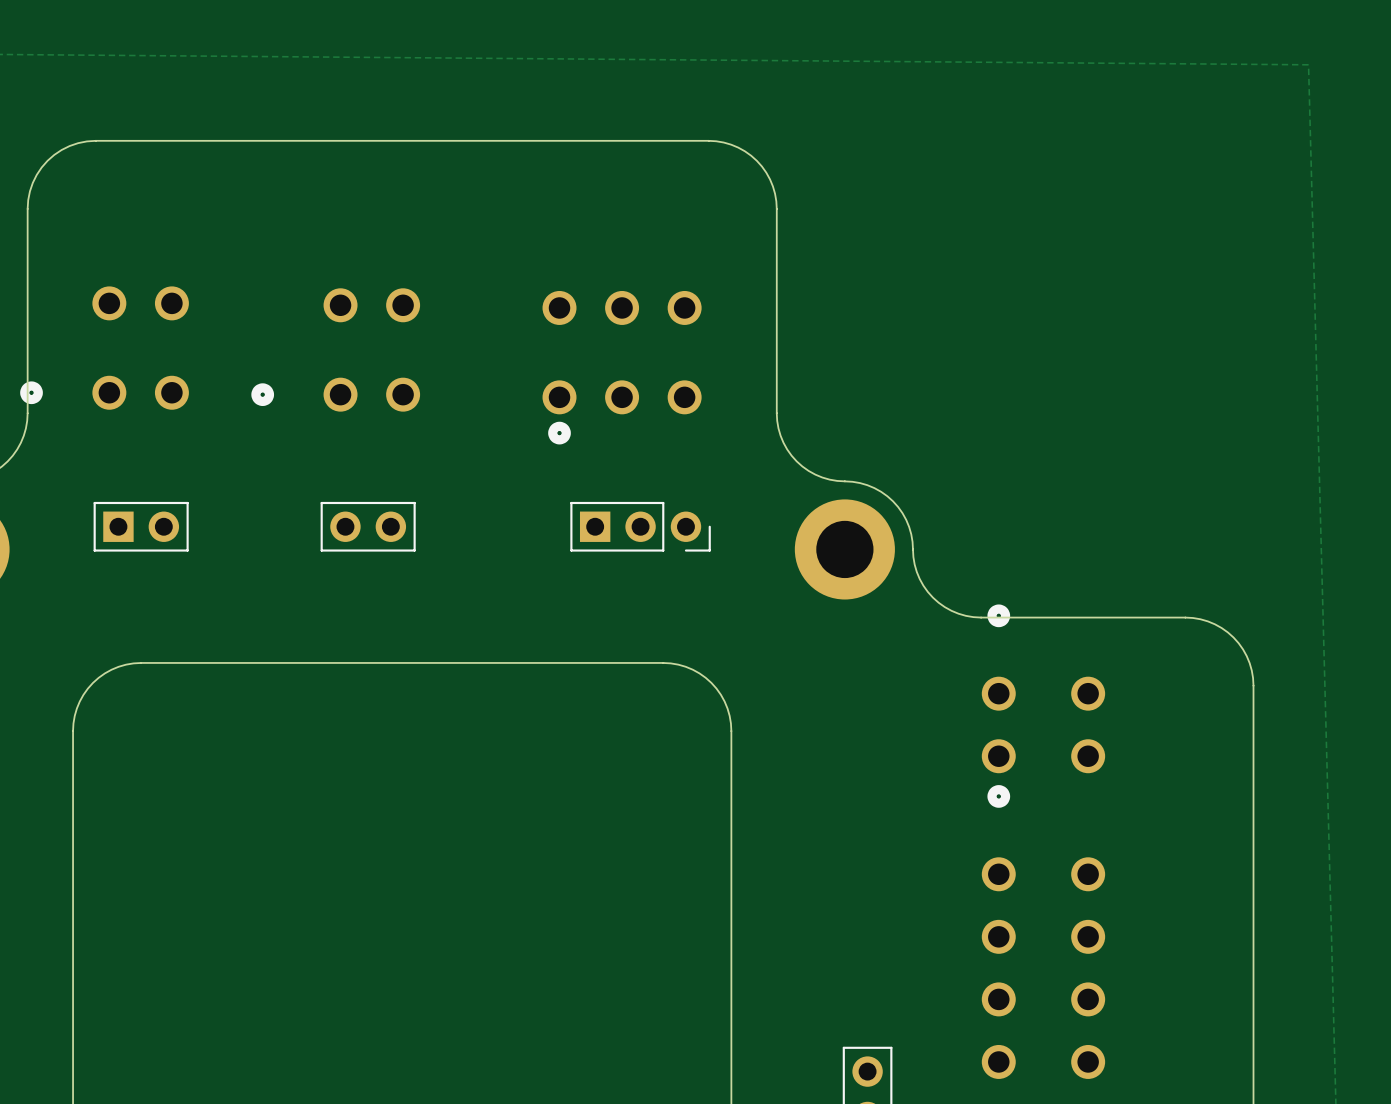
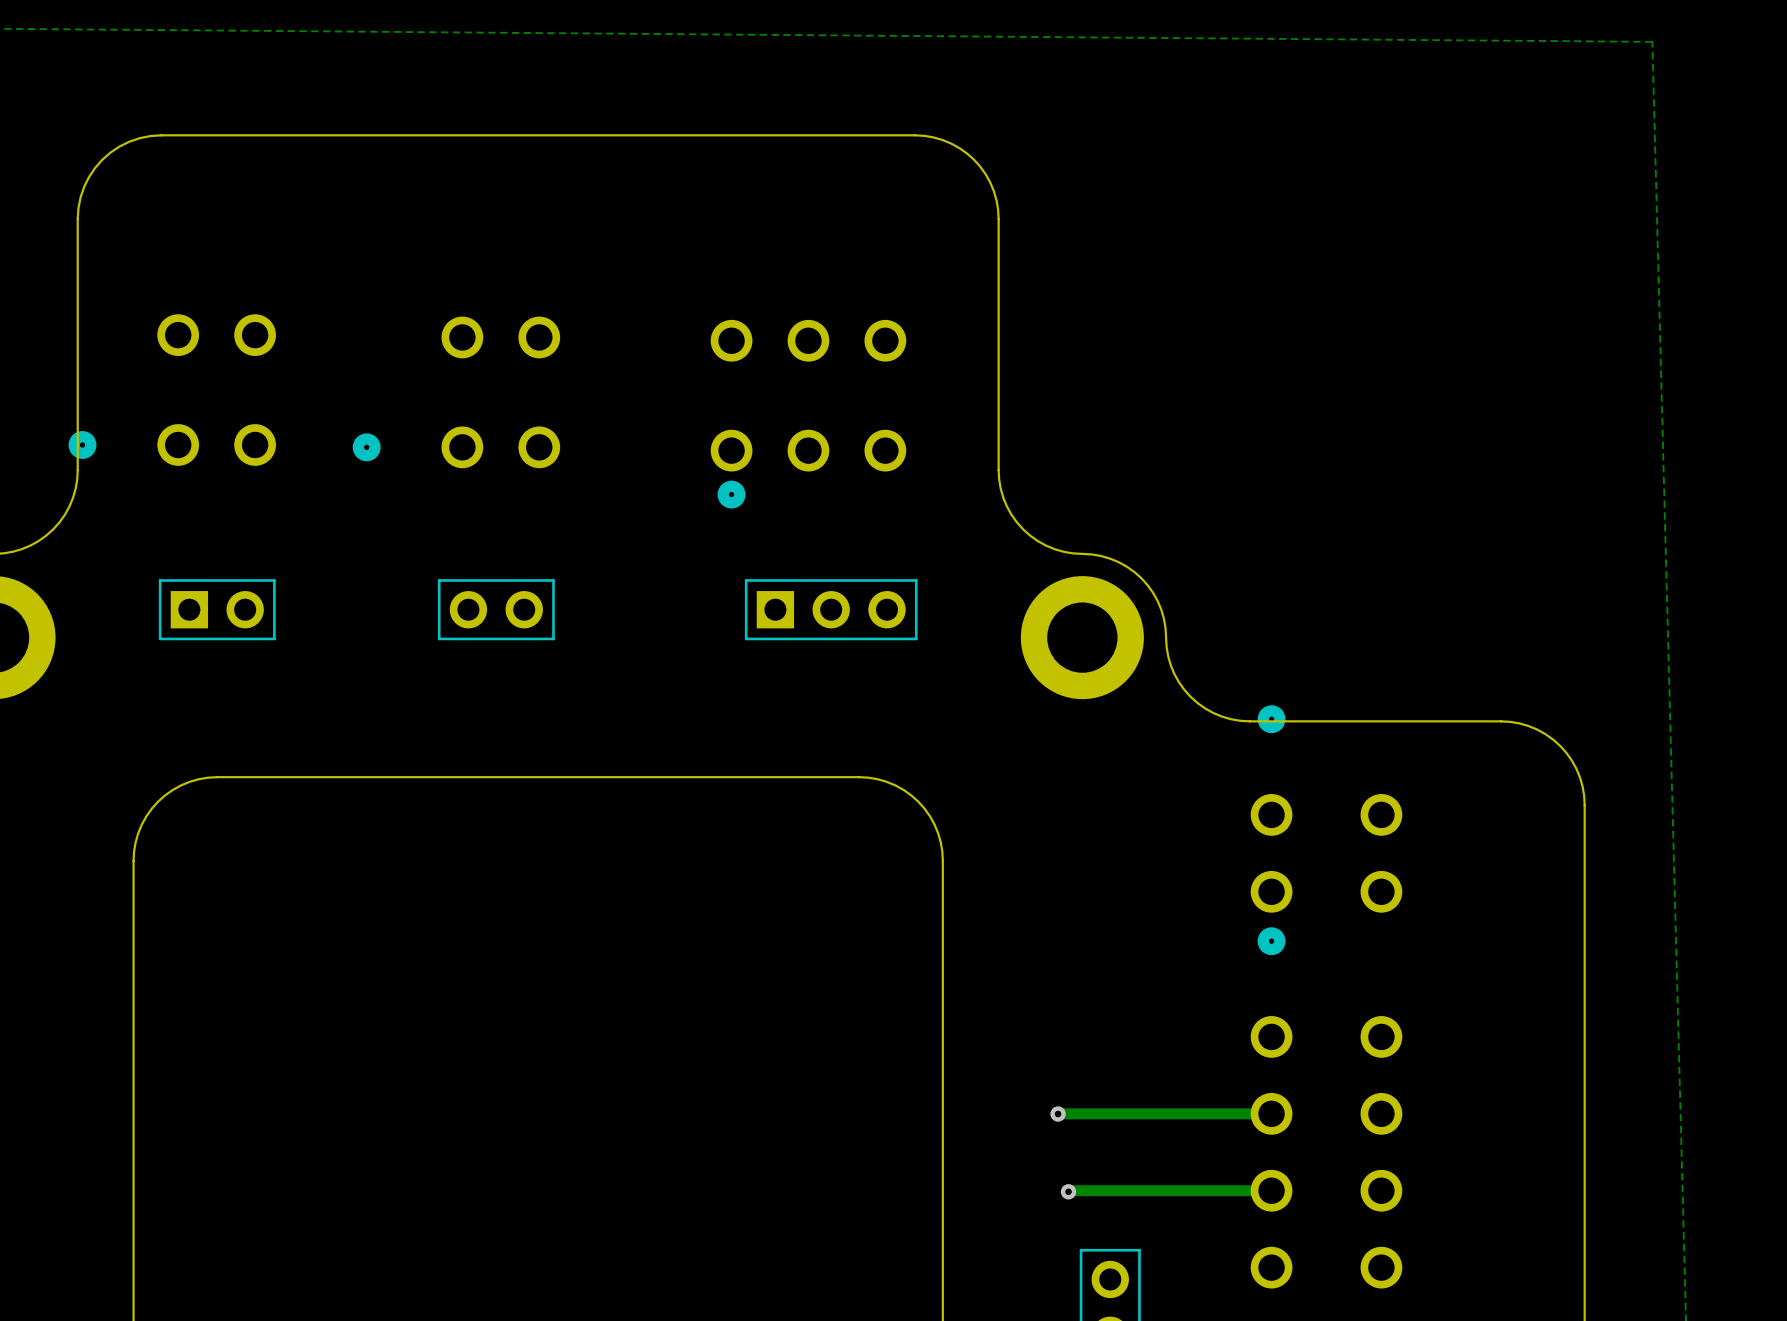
part footprint: [570, 501, 711, 552] -> [744, 579, 918, 641]
via: none -> (1058, 1114)
track: none -> (1271, 1113) (1058, 1113)
track: none -> (1271, 1190) (1068, 1191)
via: none -> (1068, 1191)

